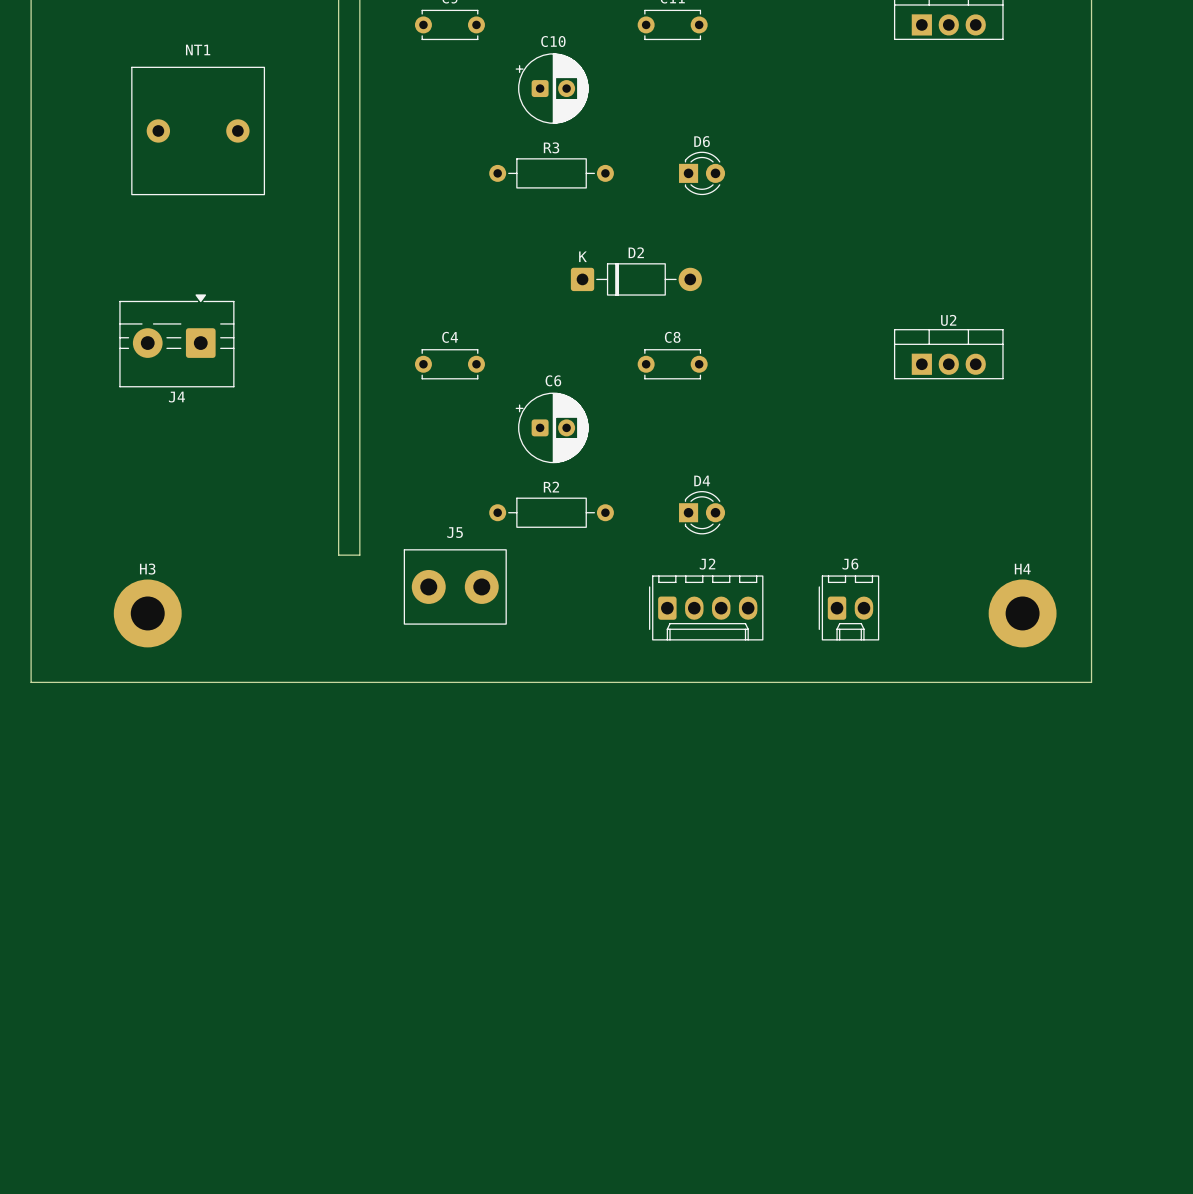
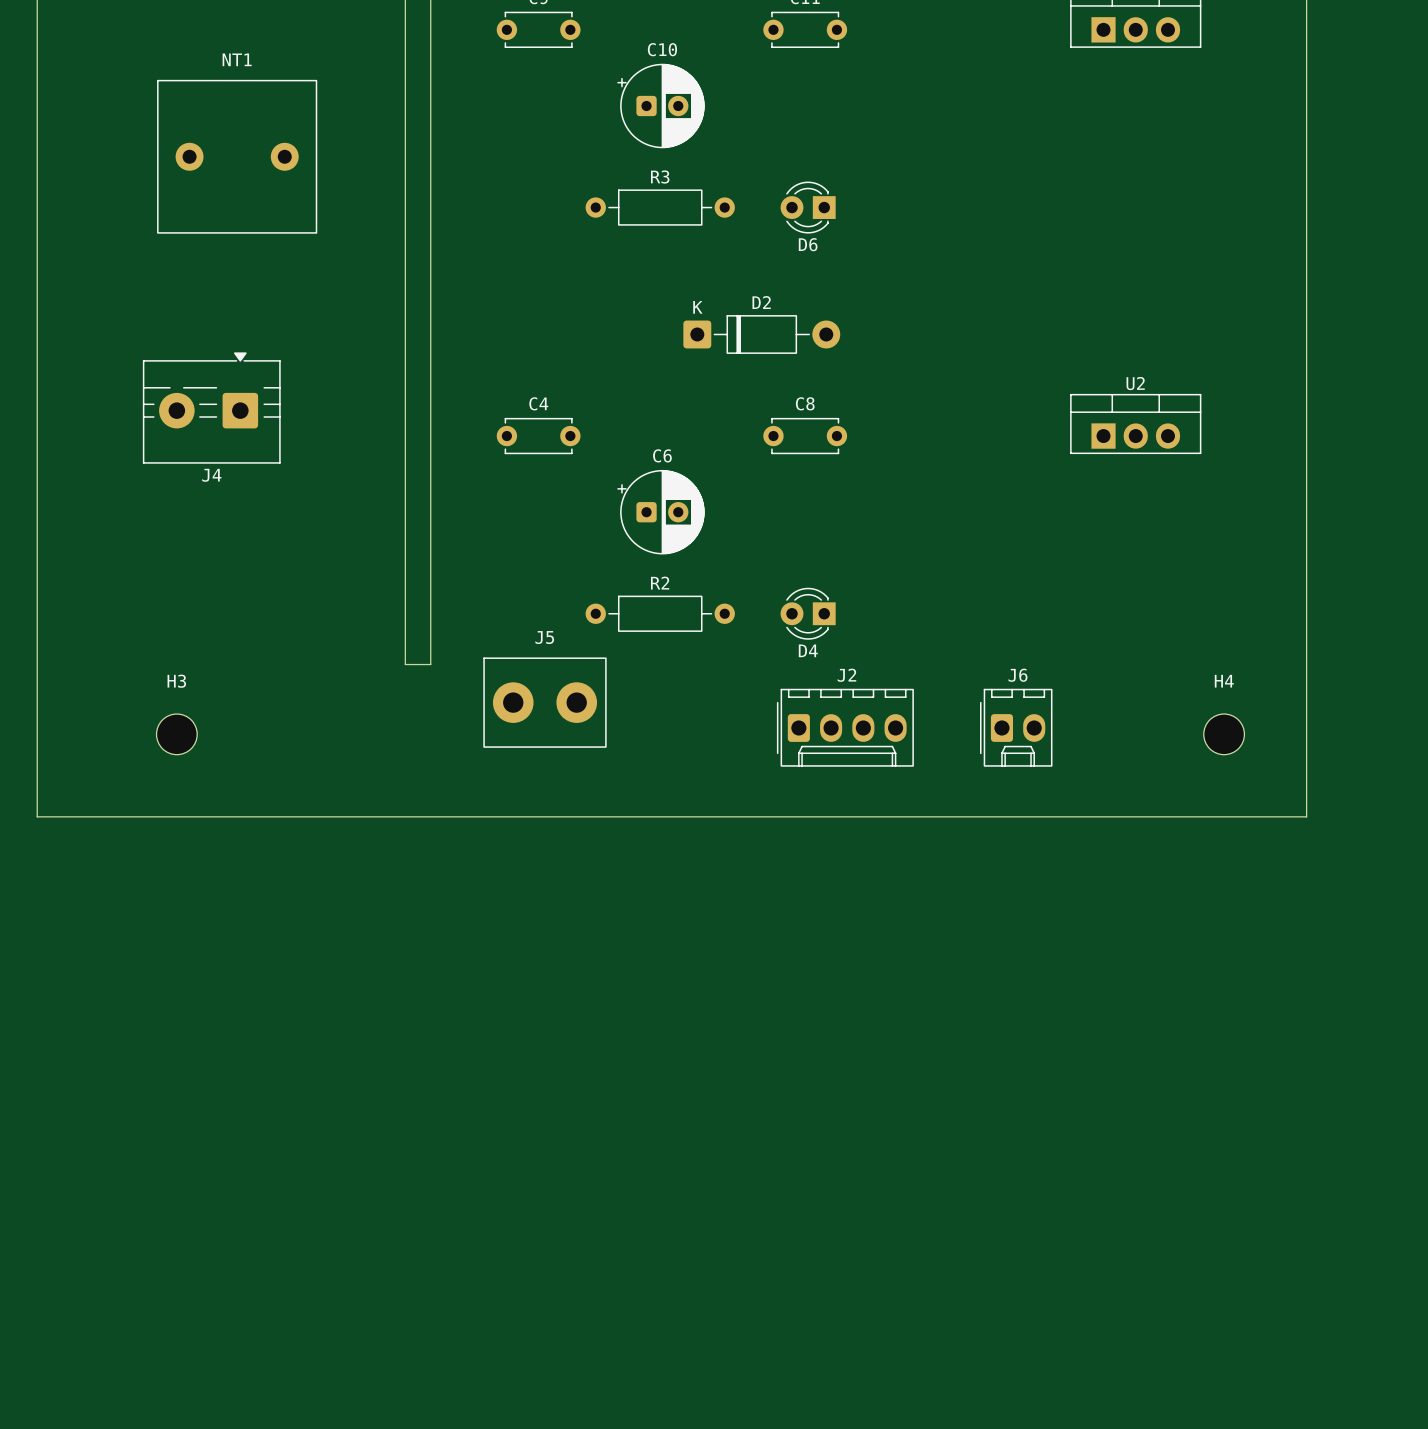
D6 rotation: 0° (702, 173) -> 180° (808, 207)
D4 rotation: 0° (702, 512) -> 180° (808, 613)
H3 footprint: [113, 579, 182, 648] -> [156, 714, 198, 755]
H4 footprint: [988, 579, 1057, 648] -> [1203, 714, 1245, 755]

